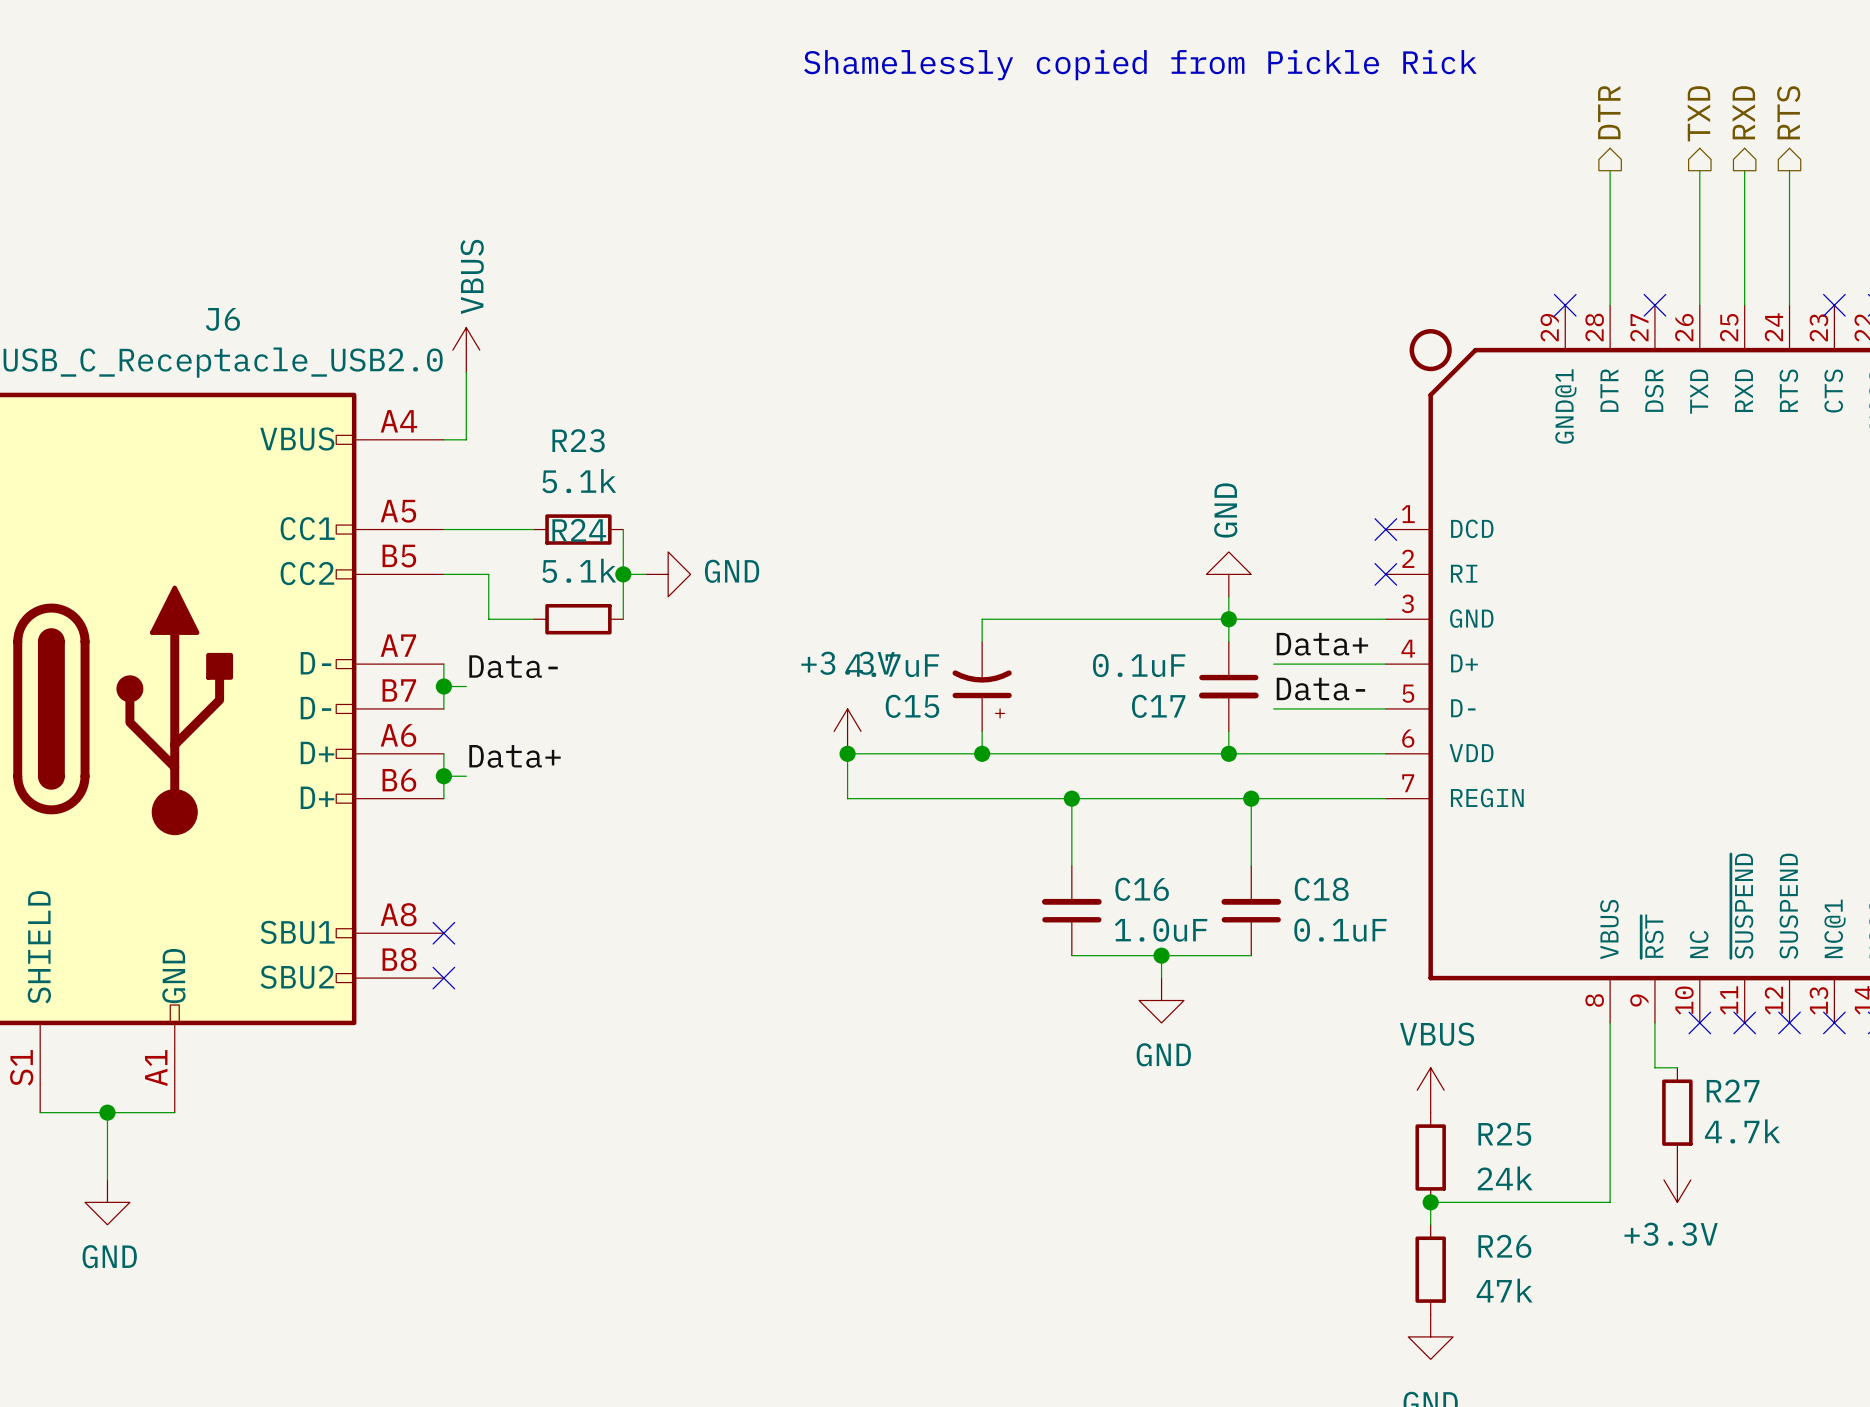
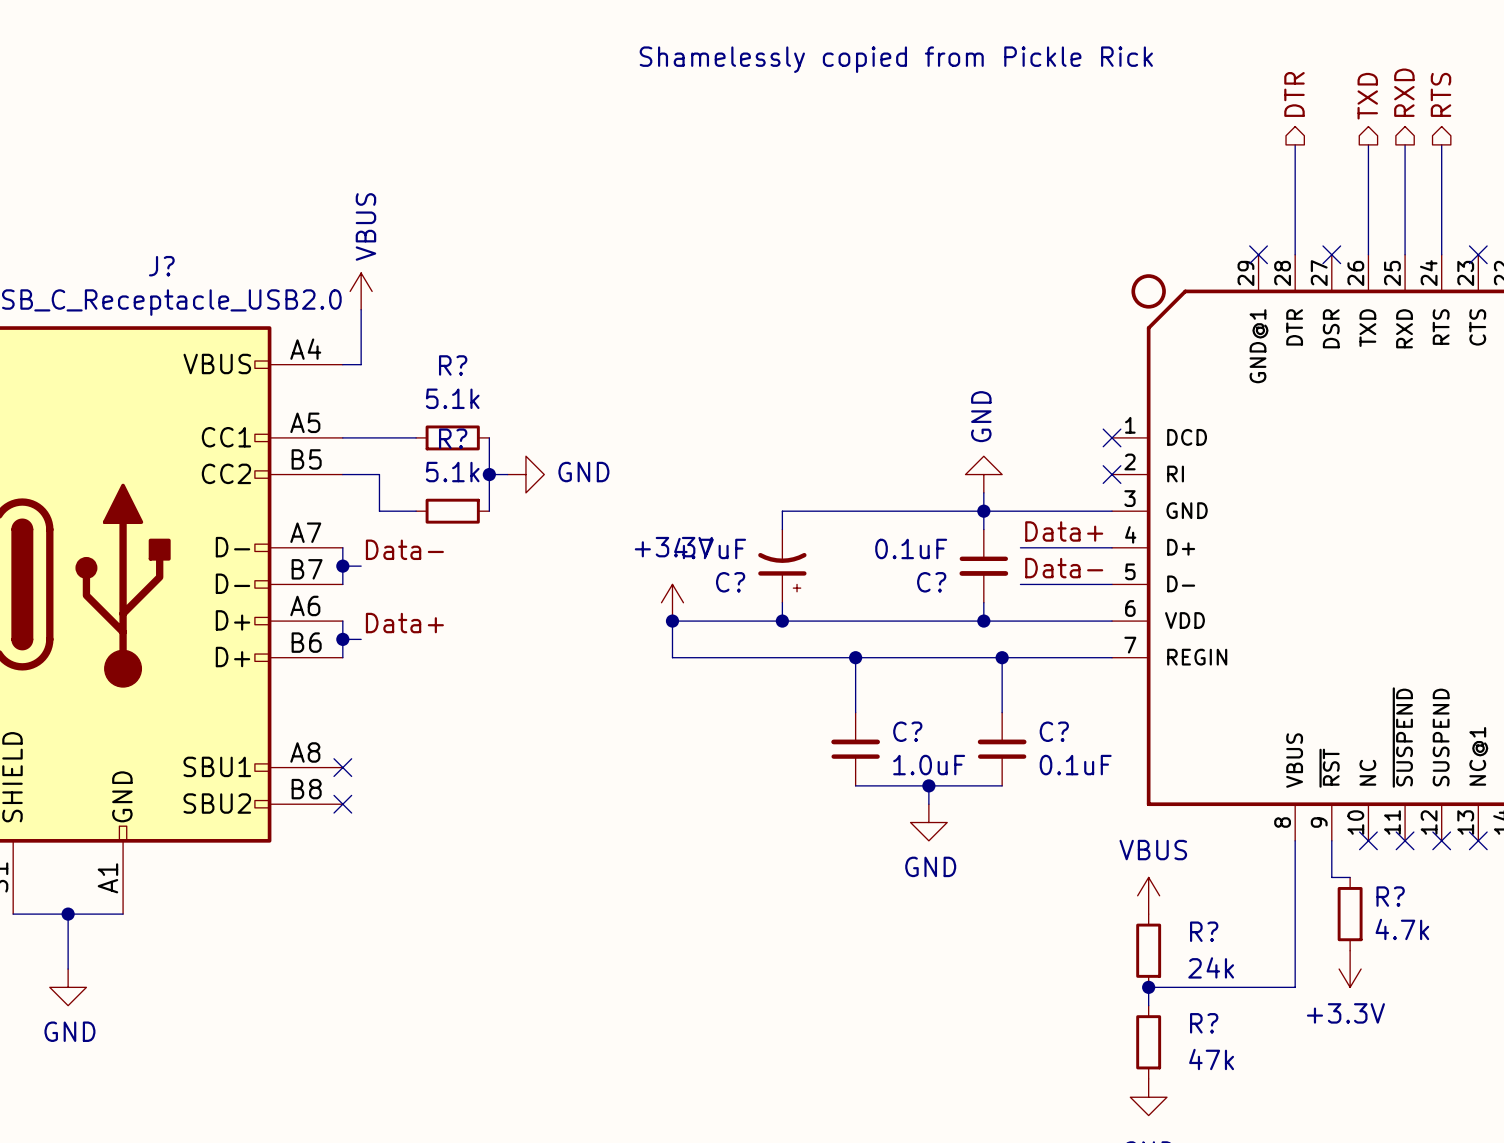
J6 name: J6 (222, 319) -> J? (161, 266)
R23 name: R23 (578, 440) -> R? (453, 365)
R24 name: R24 (579, 530) -> R? (453, 438)
C15 name: C15 (912, 706) -> C? (730, 582)
C17 name: C17 (1158, 706) -> C? (931, 582)
C16 name: C16 (1142, 889) -> C? (907, 731)
C18 name: C18 (1321, 889) -> C? (1054, 731)
R27 name: R27 (1733, 1090) -> R? (1390, 896)
R25 name: R25 (1504, 1134) -> R? (1204, 931)
R26 name: R26 (1504, 1246) -> R? (1204, 1023)

